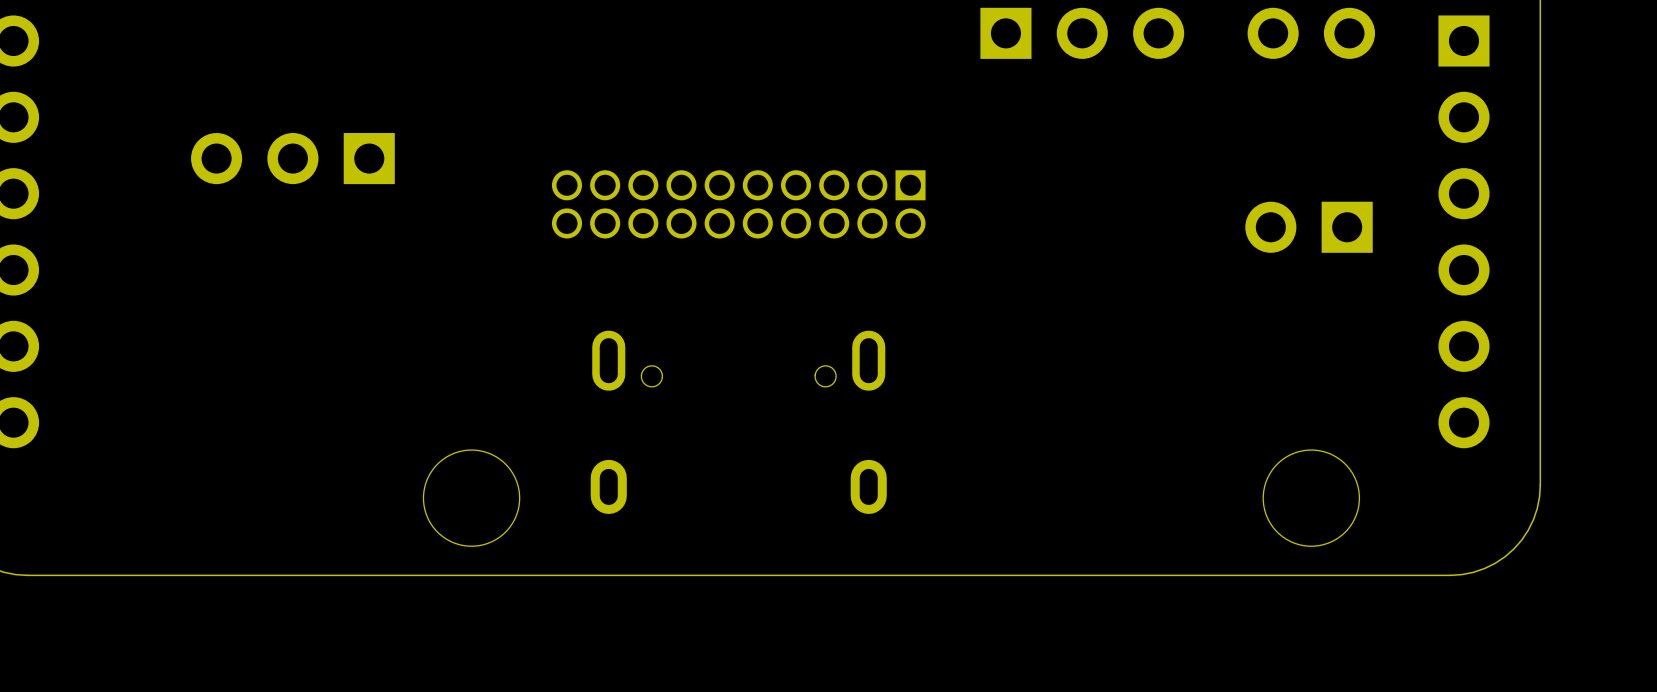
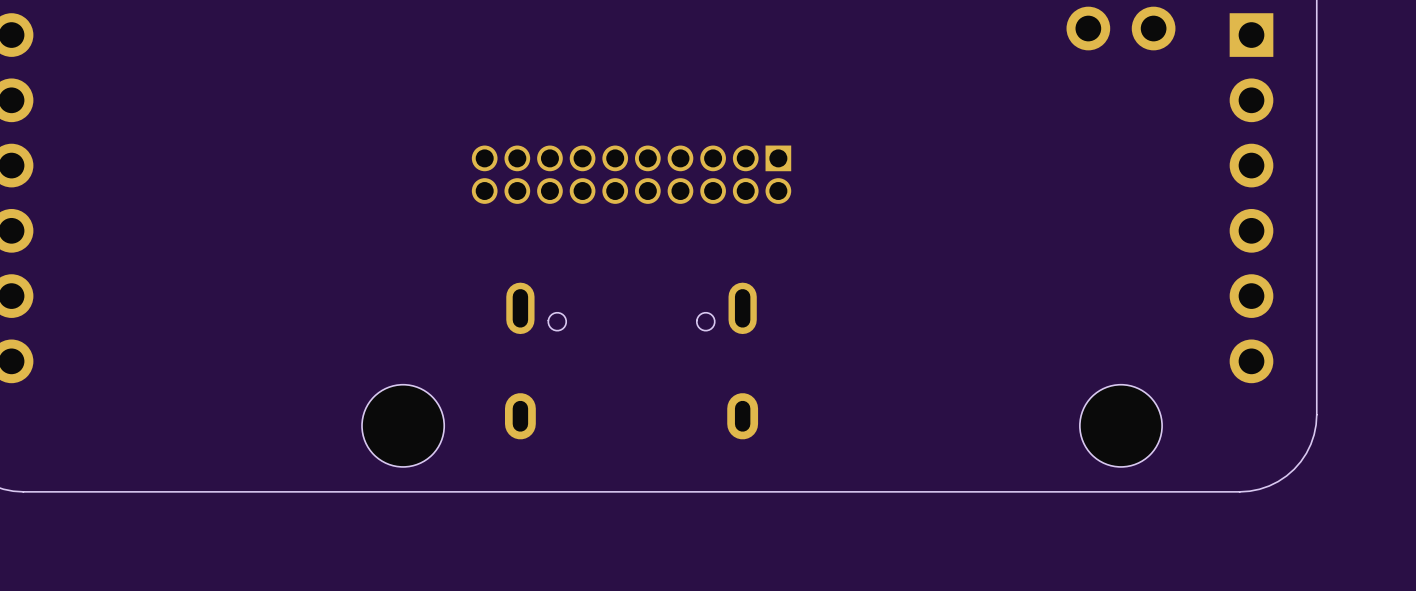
part: (1082, 33) -> none
part: (292, 158) -> none
part: (1309, 227) -> none

